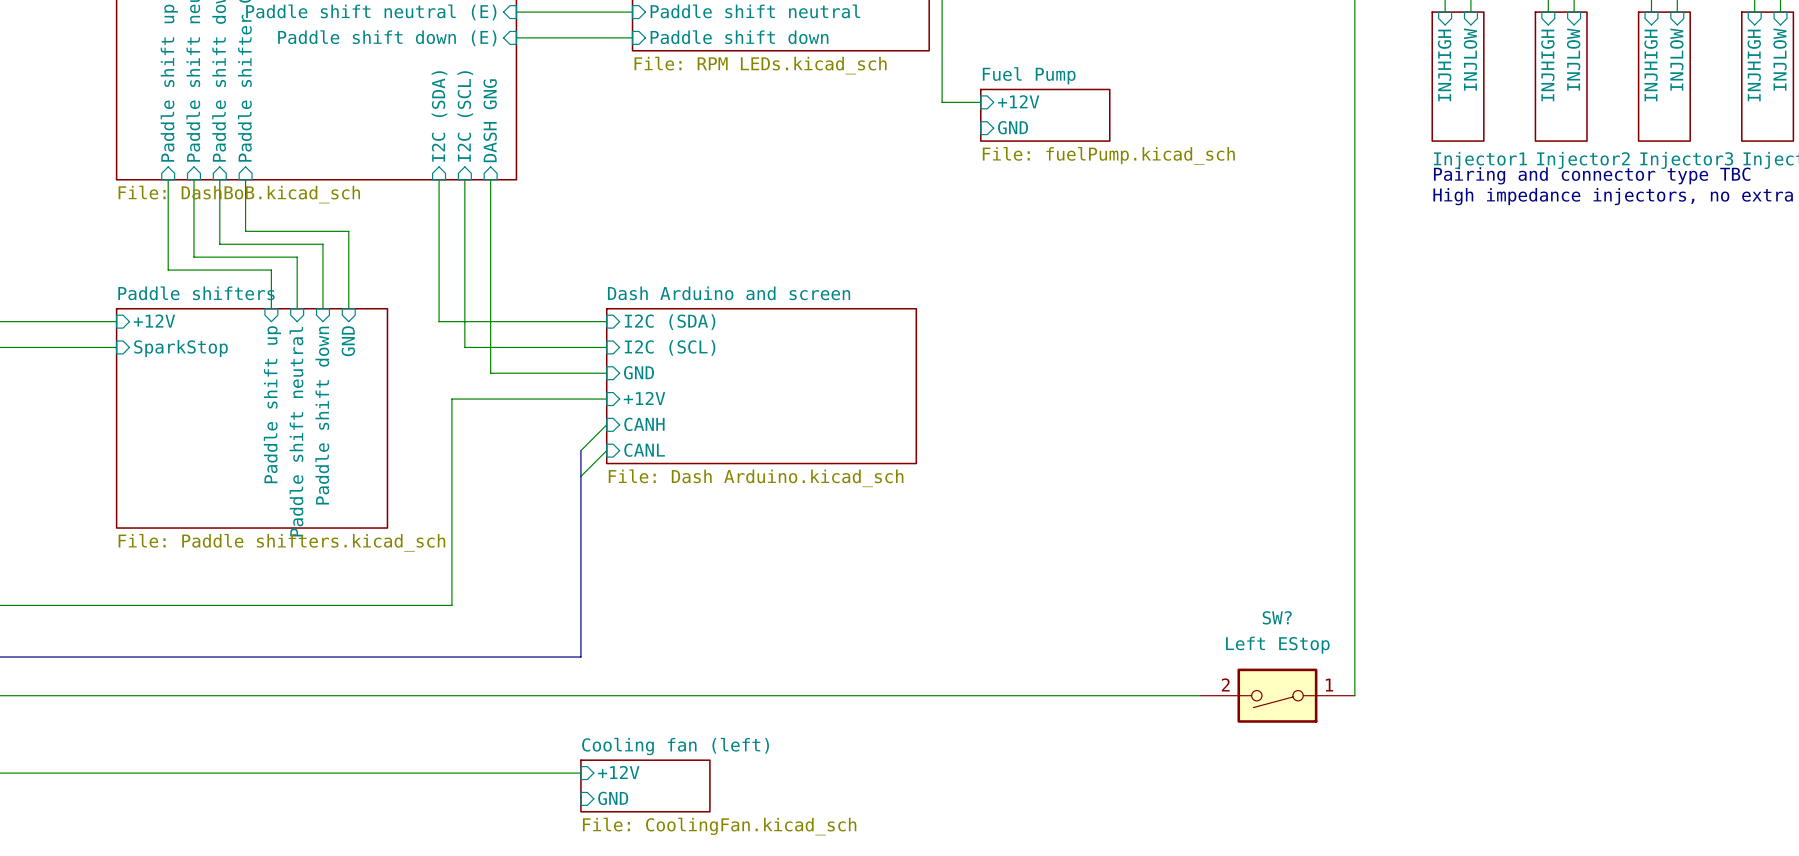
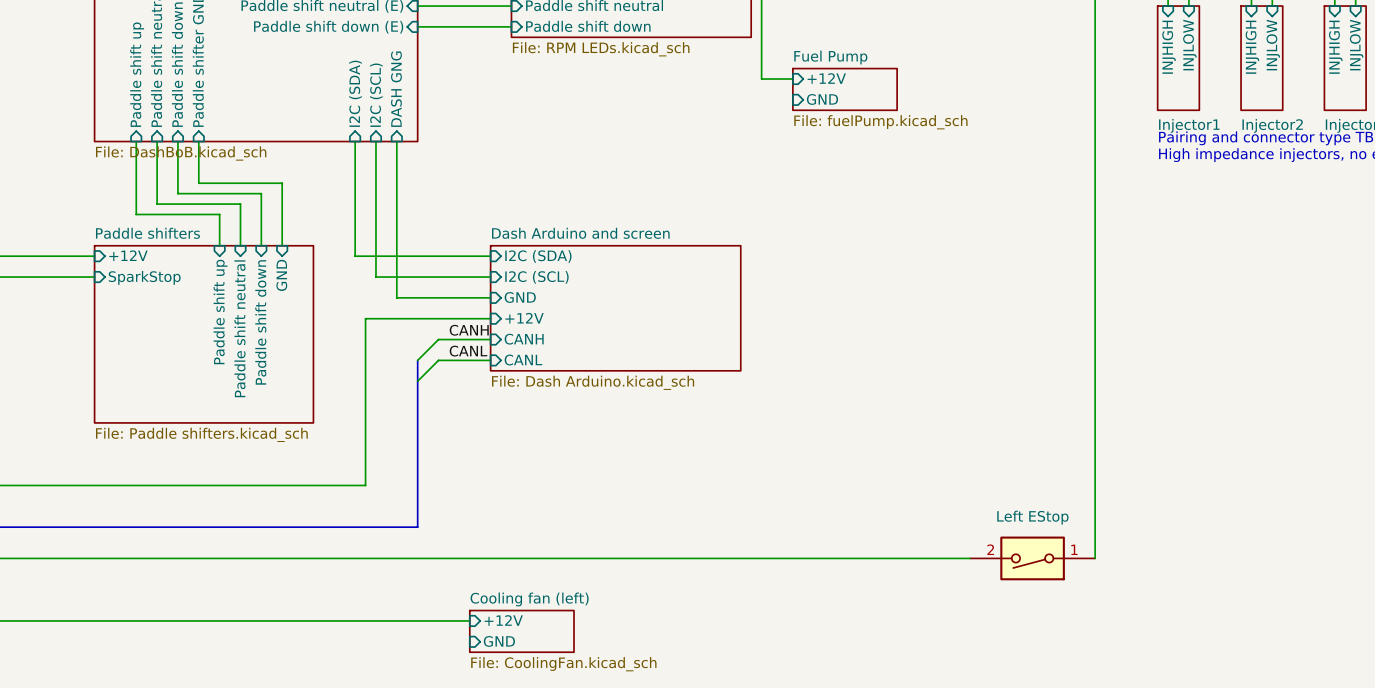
label: none -> CANH (469, 330)
wire: (606, 424) (580, 450) -> (490, 339) (438, 339) (417, 360)
label: none -> CANL (468, 351)
bus: (580, 450) (580, 657) (516, 657) -> (417, 360) (417, 527)
wire: (606, 450) (580, 476) -> (490, 360) (438, 360) (417, 381)
SW? name: SW? (1277, 617) -> none

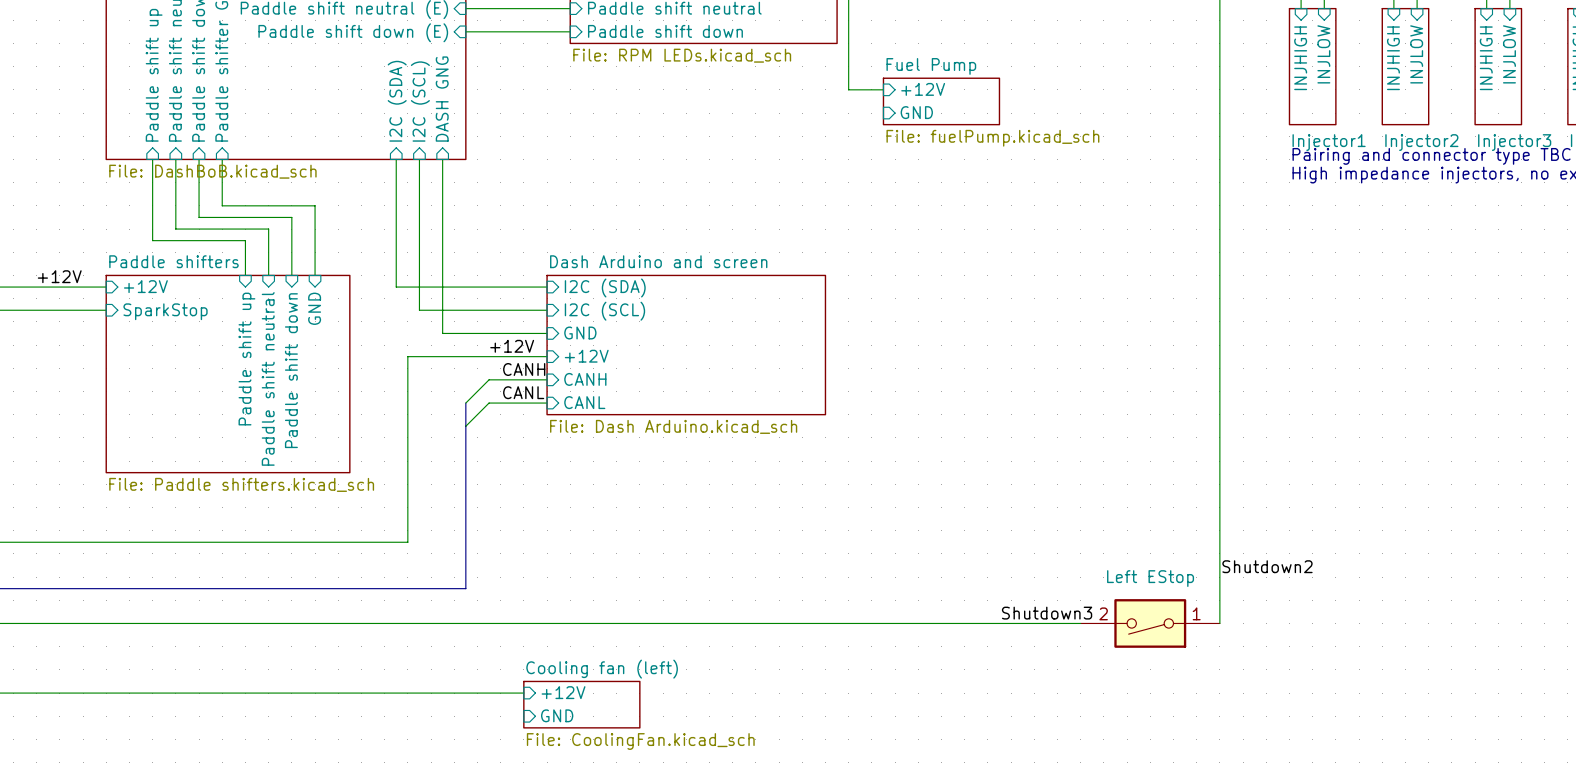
label: none -> +12V (59, 276)
label: none -> +12V (512, 346)
label: none -> Shutdown2 (1267, 566)
label: none -> Shutdown3 (1047, 613)

